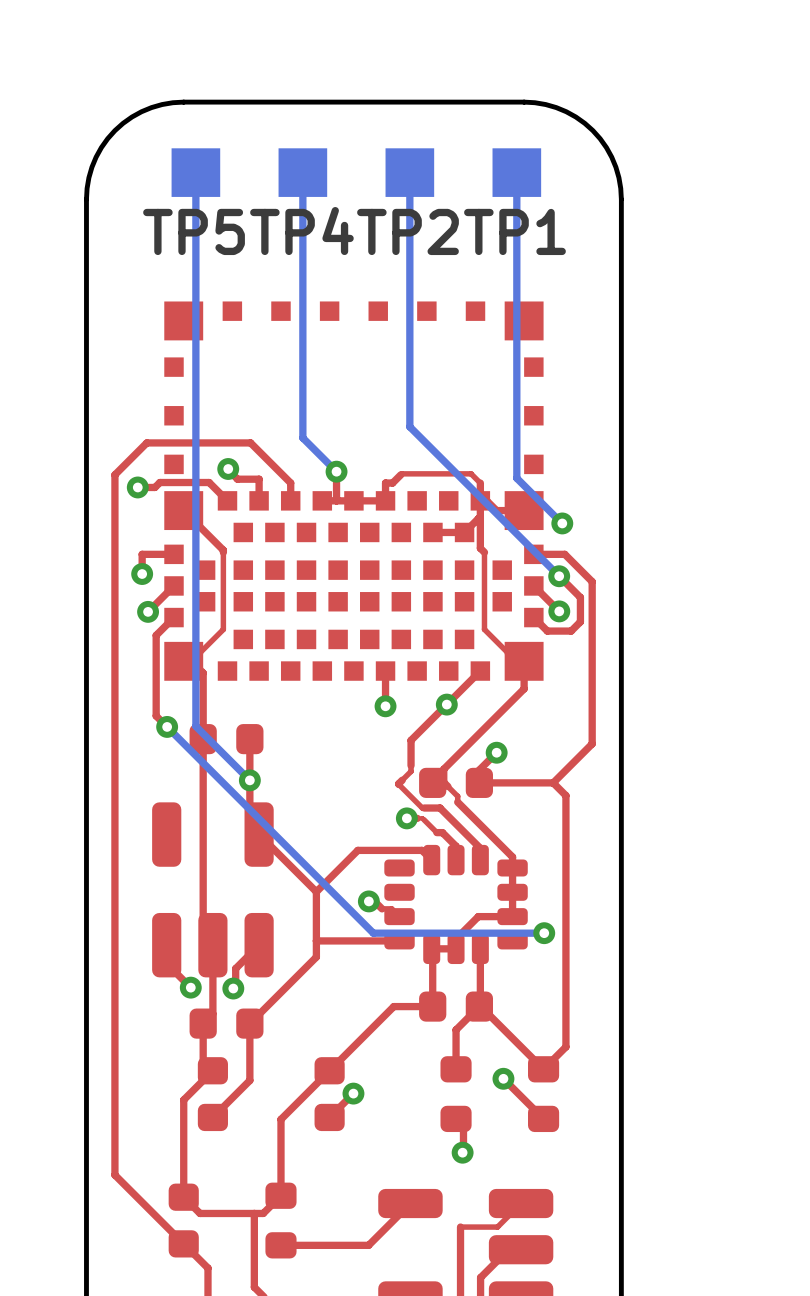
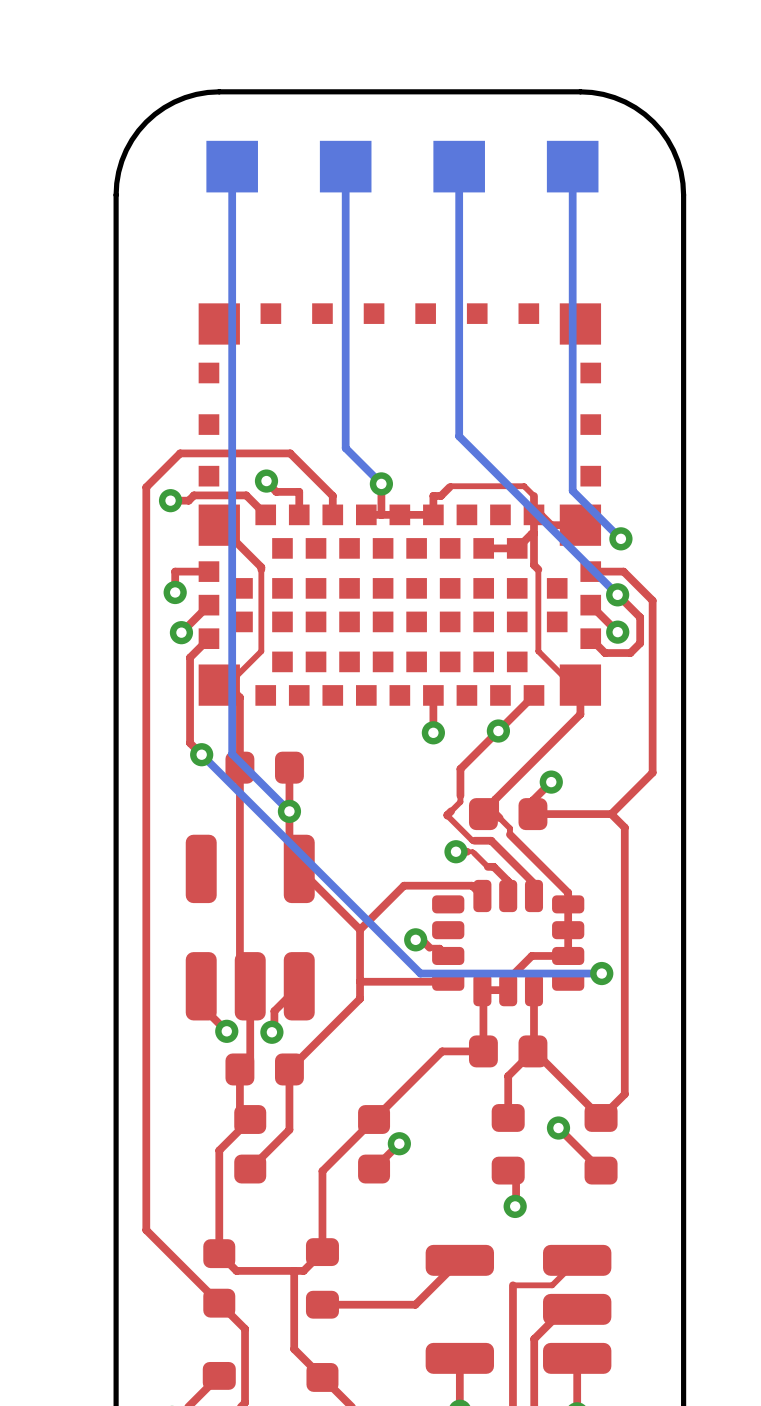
TP5 name: TP5 (194, 231) -> none
TP4 name: TP4 (301, 231) -> none
TP2 name: TP2 (407, 231) -> none
TP1 name: TP1 (514, 231) -> none

